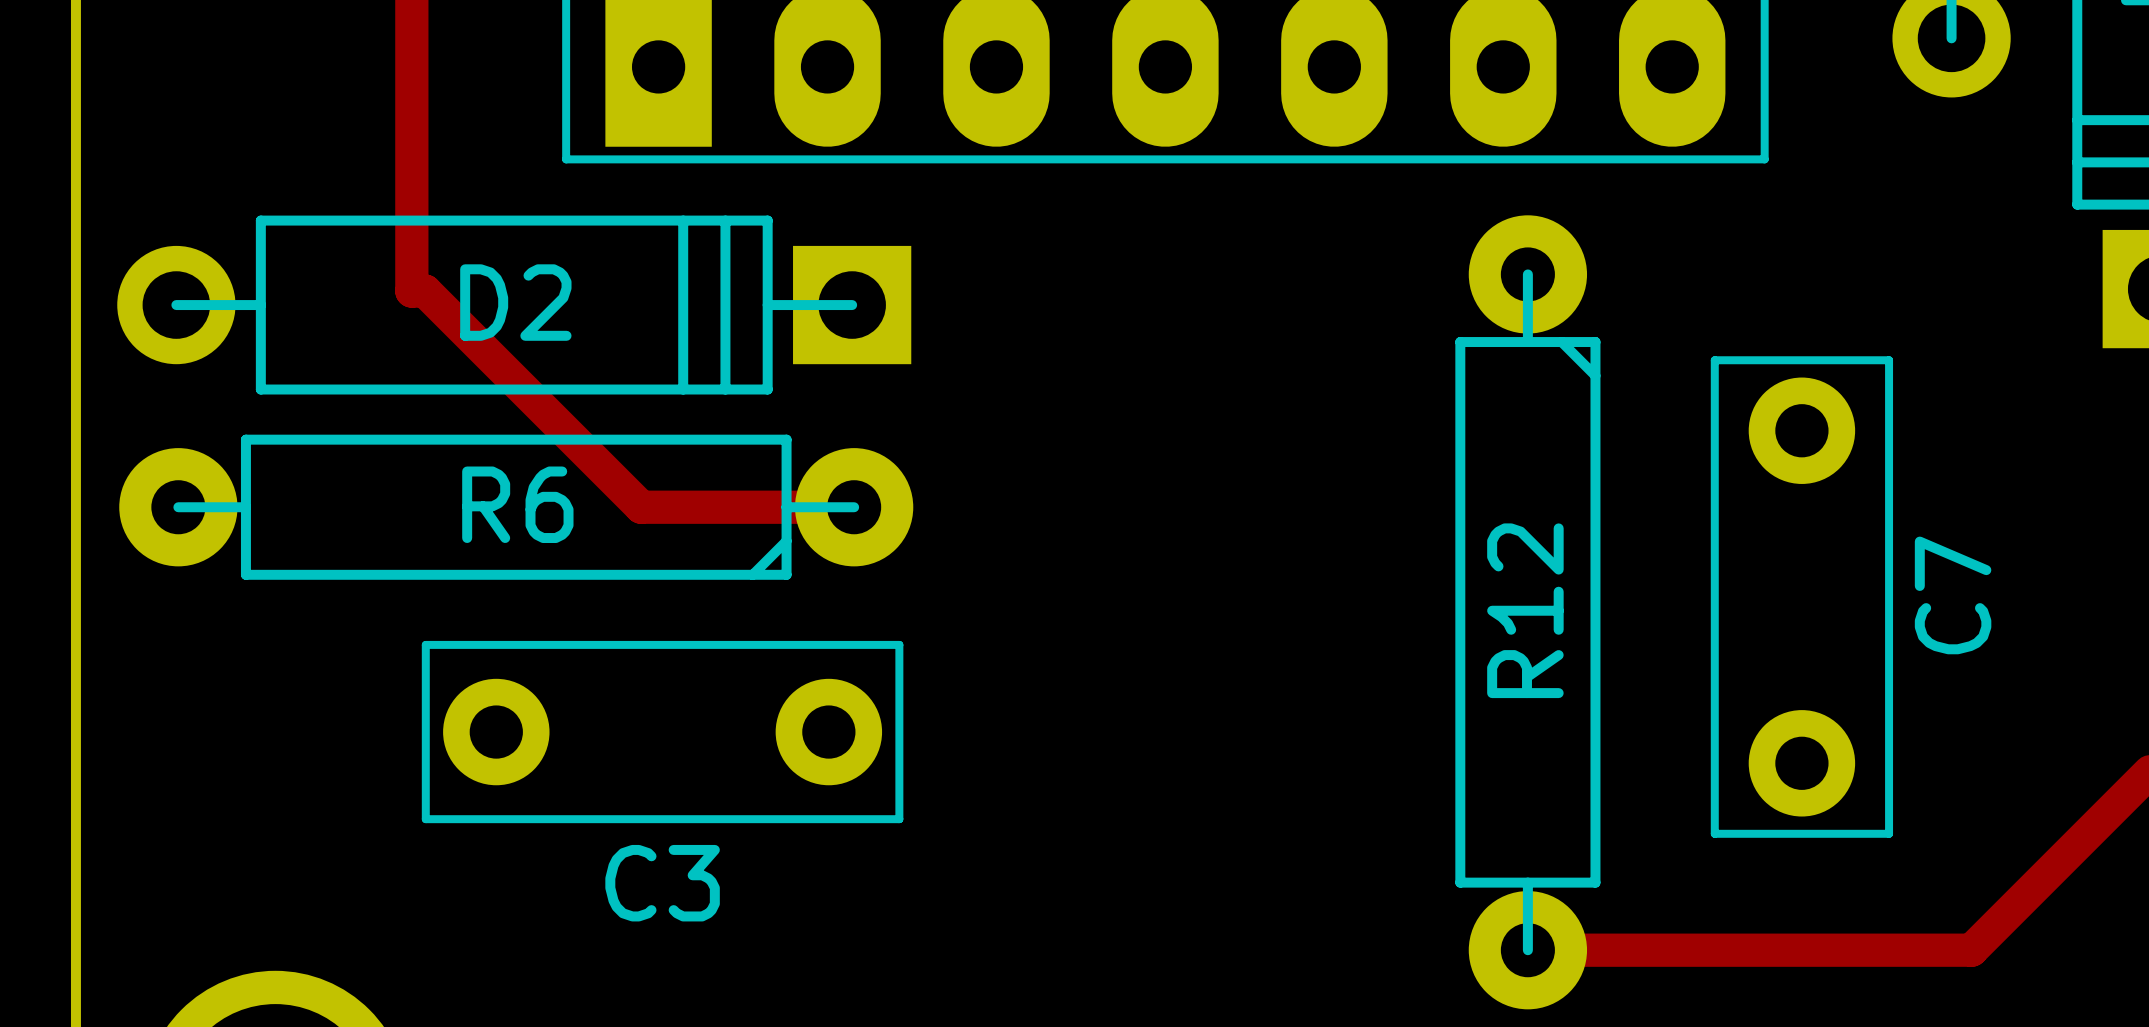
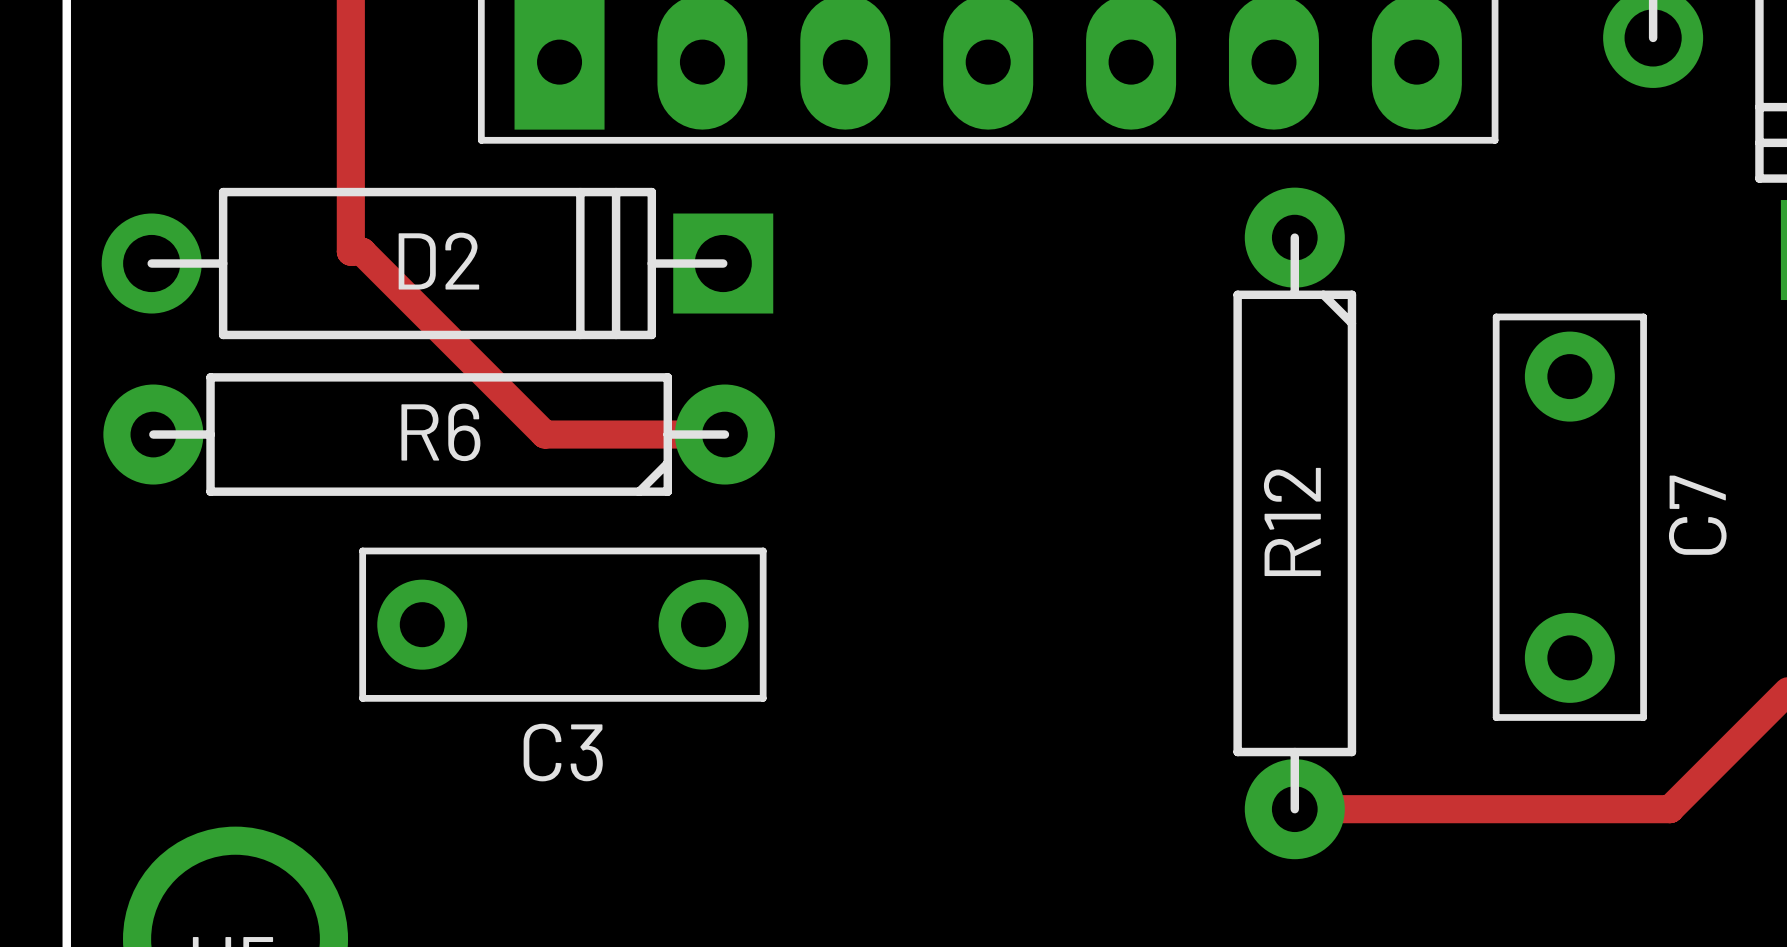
C7 position: (1801, 597) -> (1569, 517)

